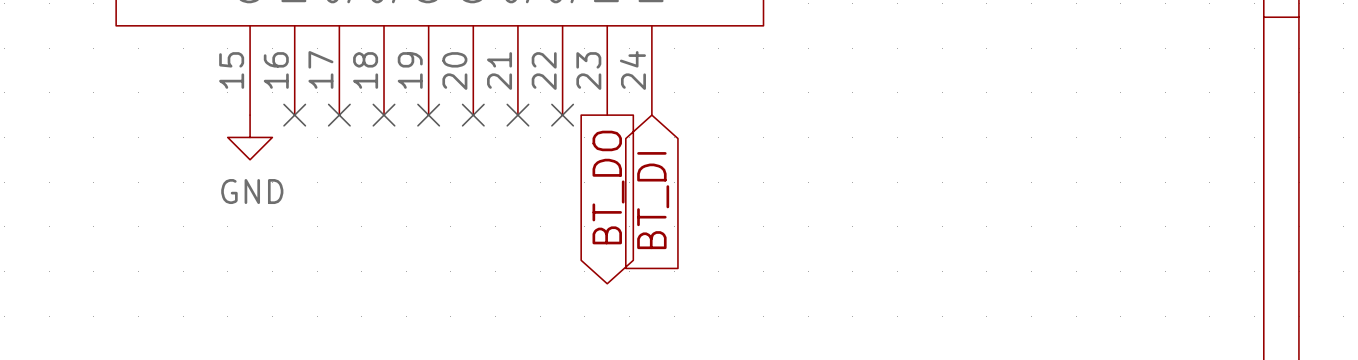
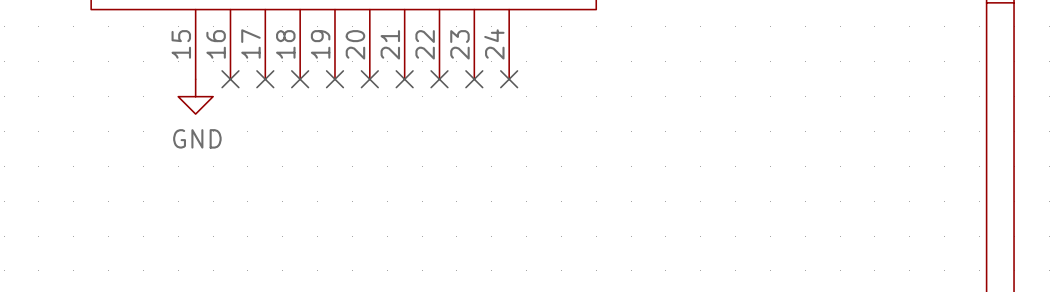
no-connect mark: none -> (474, 79)
no-connect mark: none -> (509, 79)
global label: BT_DO (608, 187) -> none
global label: BT_DI (653, 200) -> none

